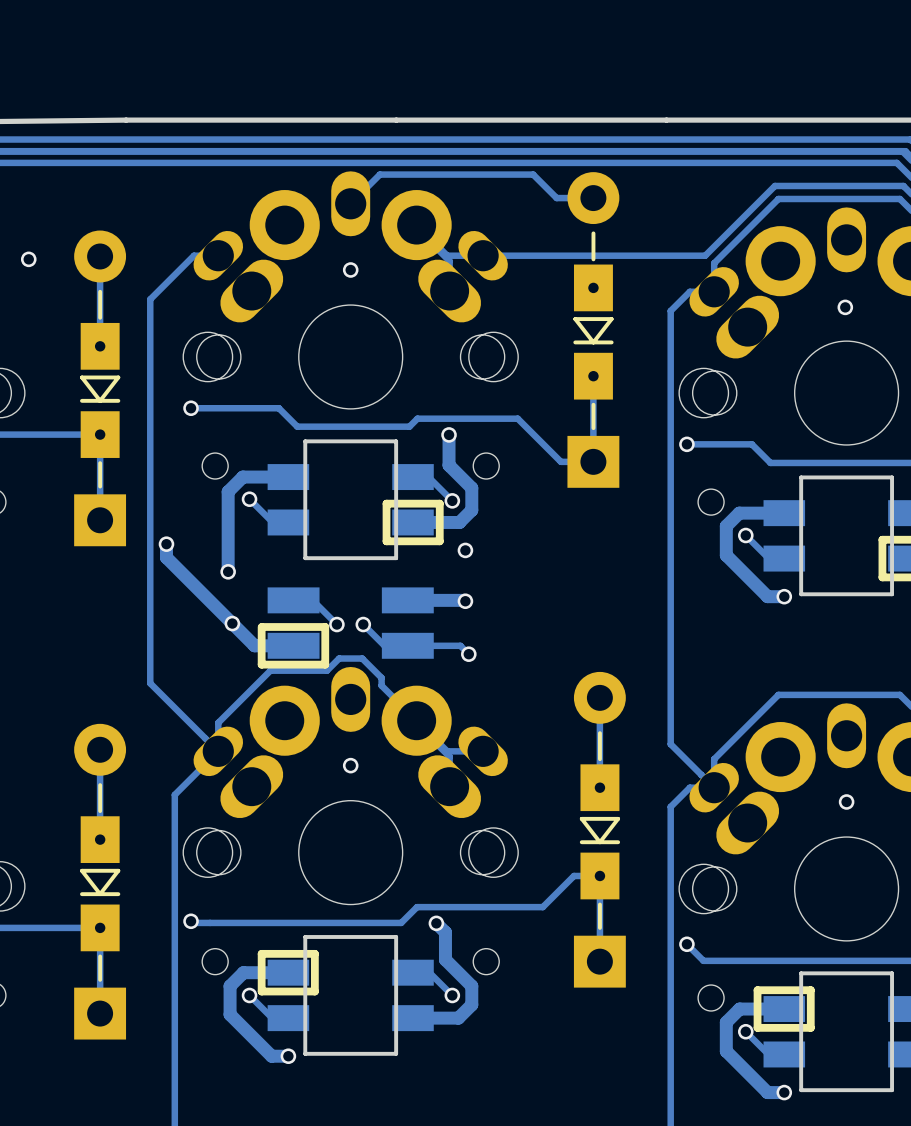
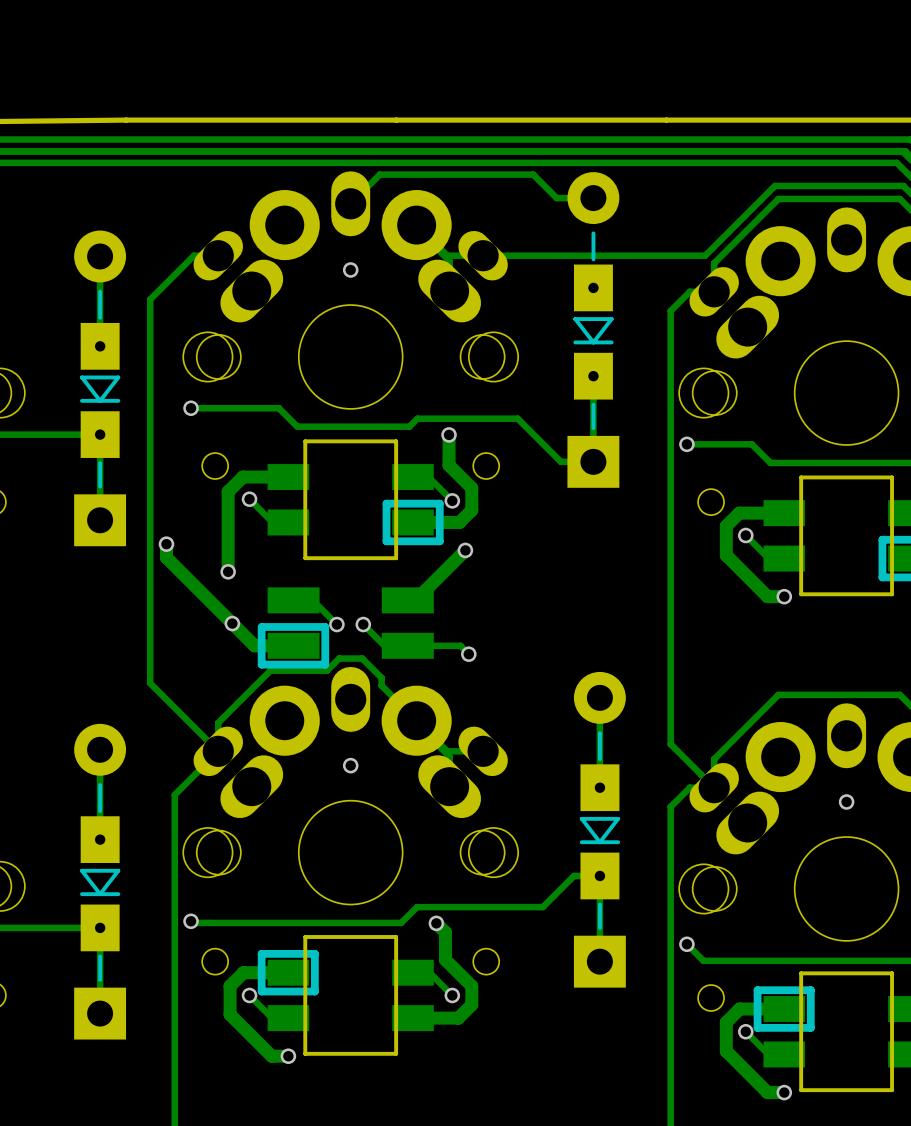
via: (28, 259) -> none
via: (845, 307) -> none
track: (415, 600) (465, 601) -> (415, 600) (465, 550)
via: (465, 601) -> none

